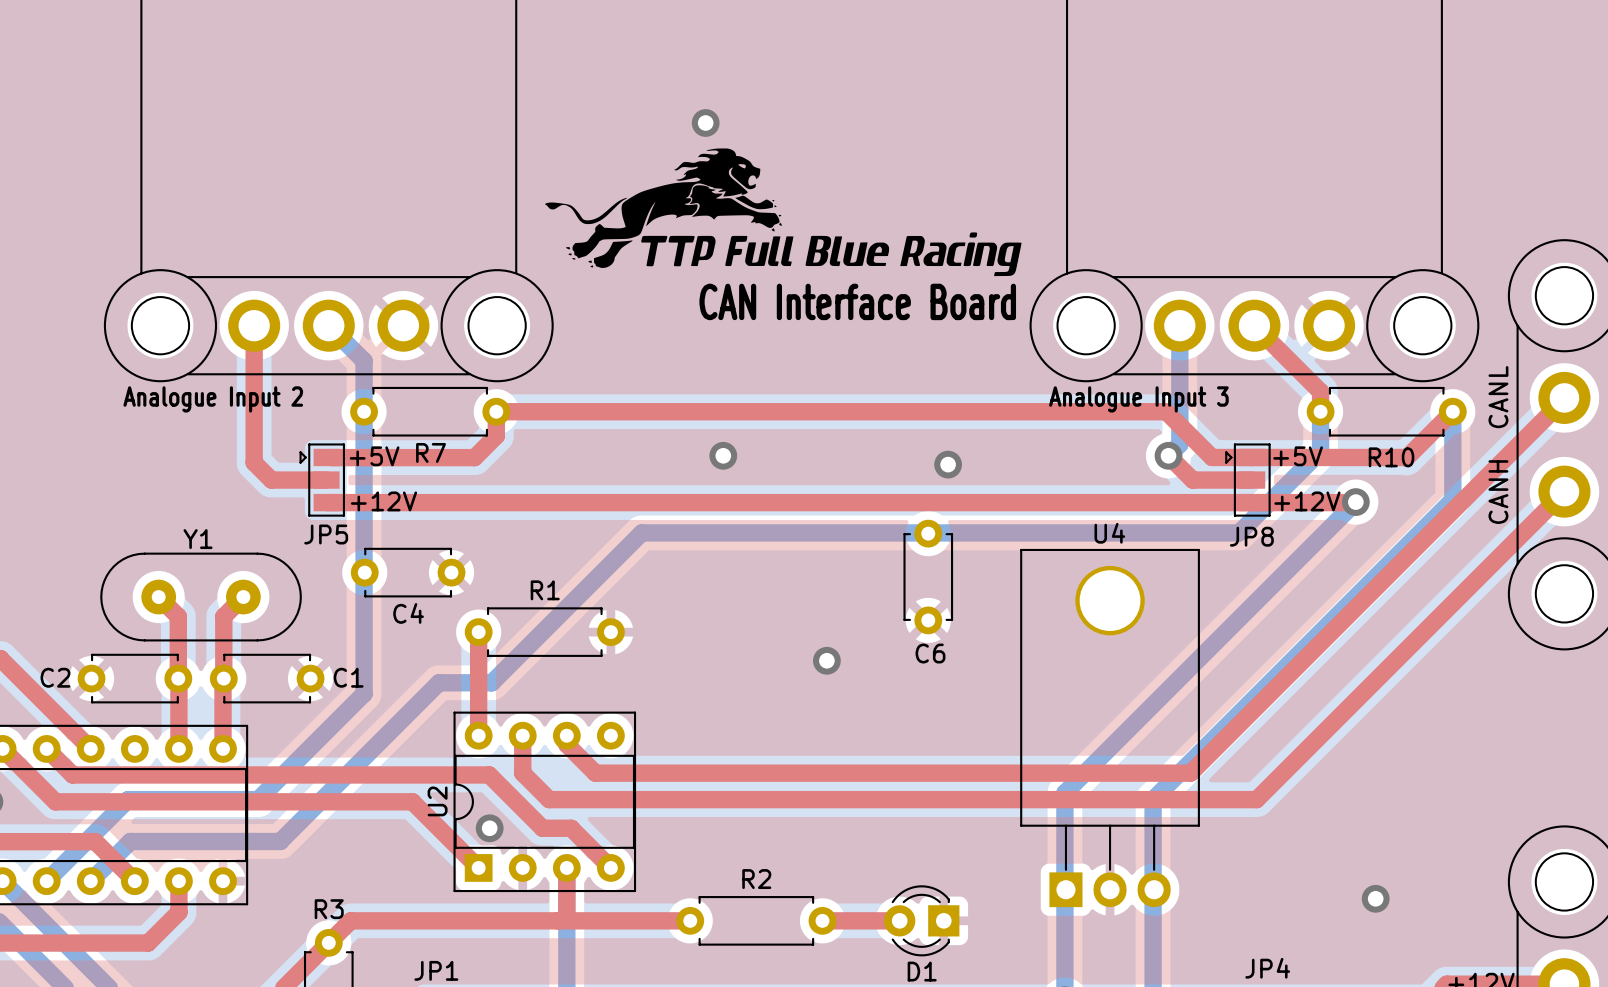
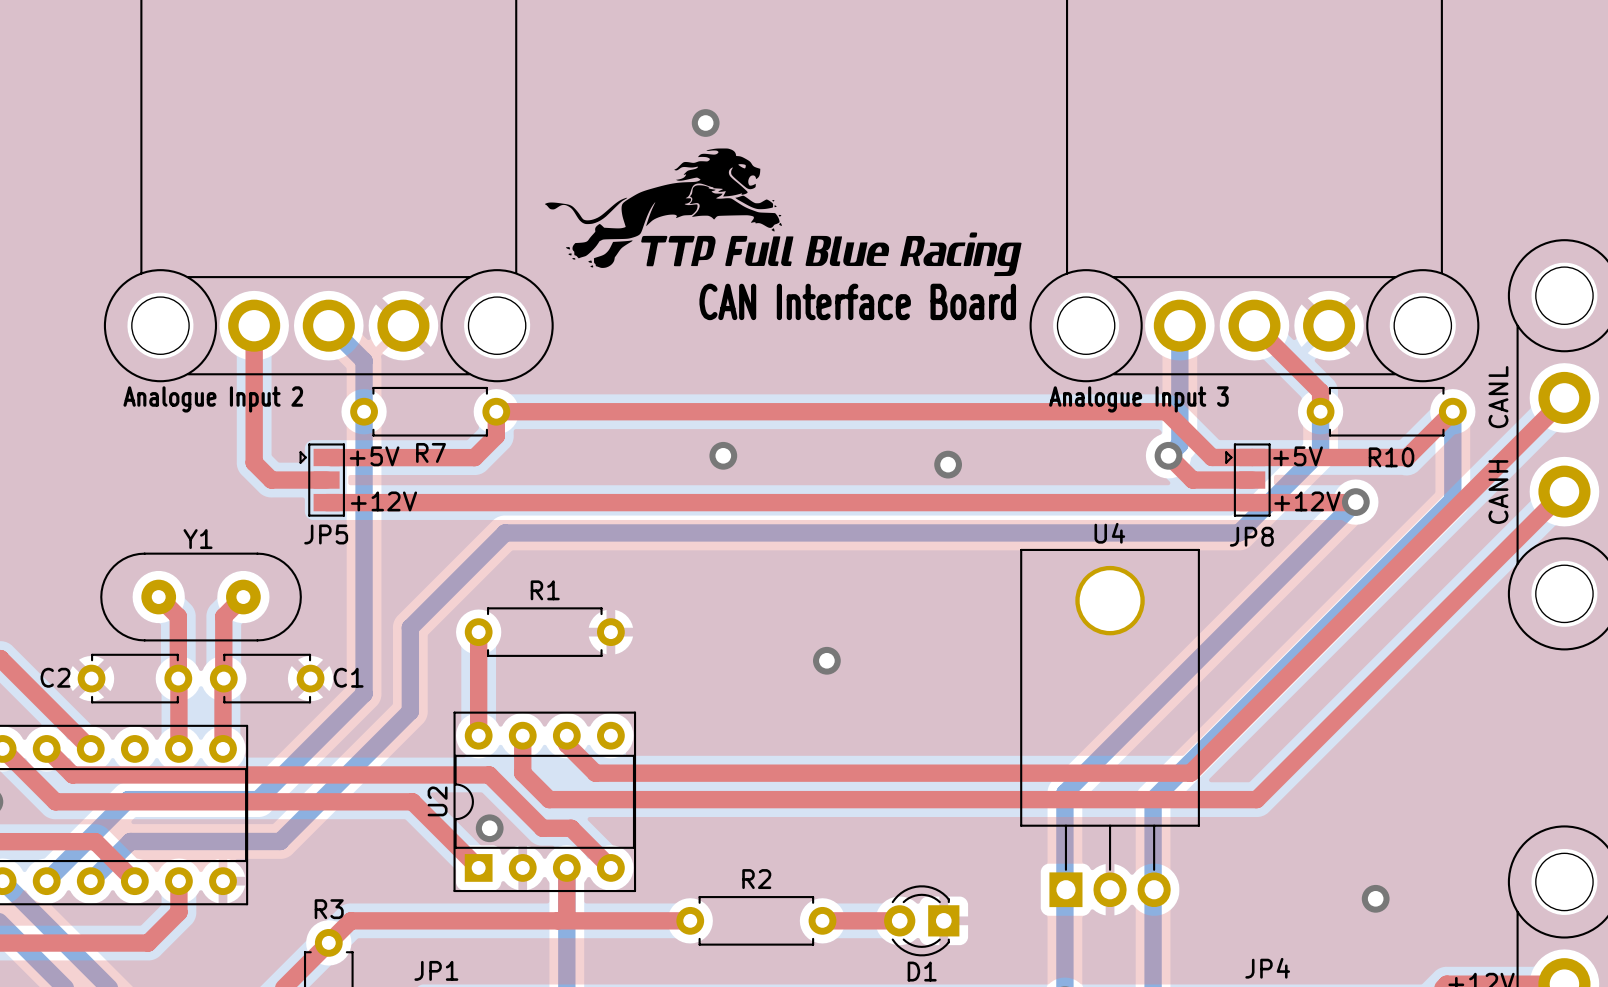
bottom track: (641, 532) (491, 682) (438, 682) (410, 711) -> (641, 532) (505, 532) (410, 627) (410, 711)
C4: (408, 572) -> none
C6: (928, 577) -> none

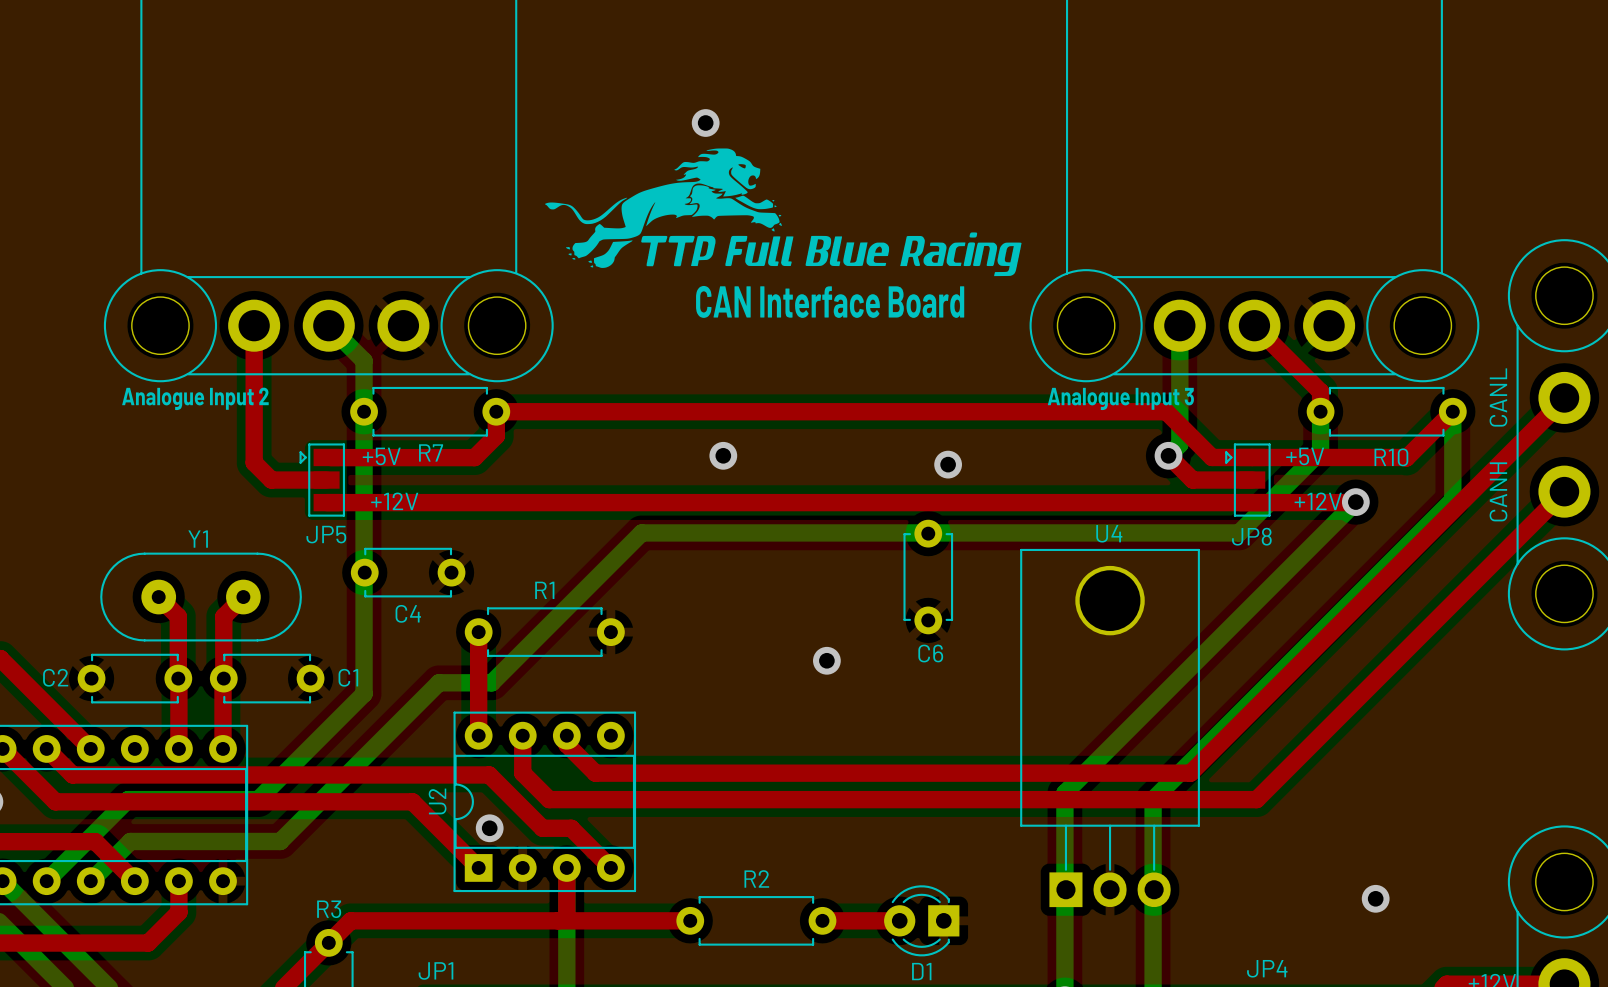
bottom track: (641, 532) (505, 532) (410, 627) (410, 711) -> (641, 532) (491, 682) (438, 682) (410, 711)
C4: none -> (408, 572)
C6: none -> (928, 577)

